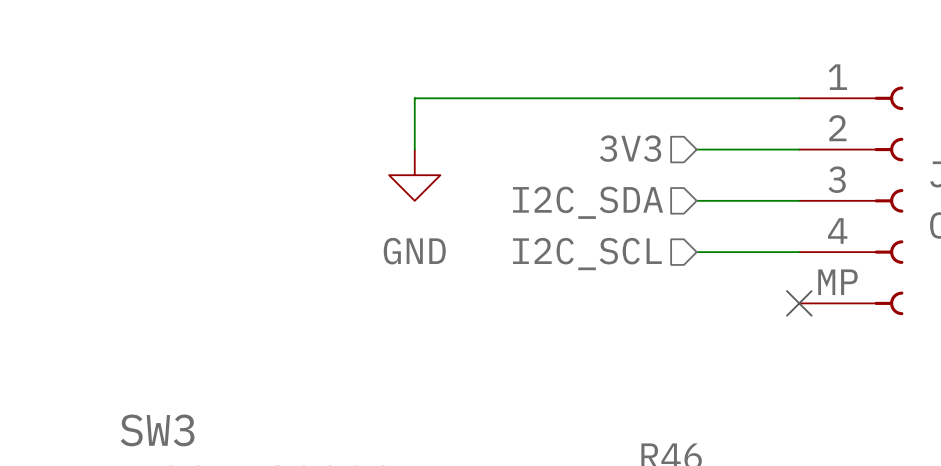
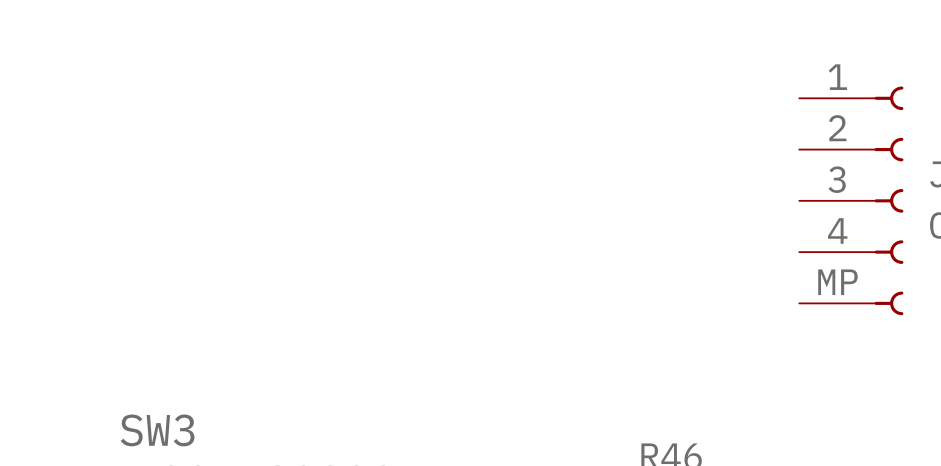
wire: (799, 98) (414, 98) (414, 149) -> none
hierarchical label: 3V3 (630, 148) -> none
wire: (696, 149) (799, 149) -> none
power symbol: GND (414, 175) -> none
wire: (696, 200) (799, 200) -> none
hierarchical label: I2C_SDA (588, 202) -> none
wire: (696, 252) (799, 252) -> none
hierarchical label: I2C_SCL (587, 254) -> none
no-connect mark: (799, 303) -> none

